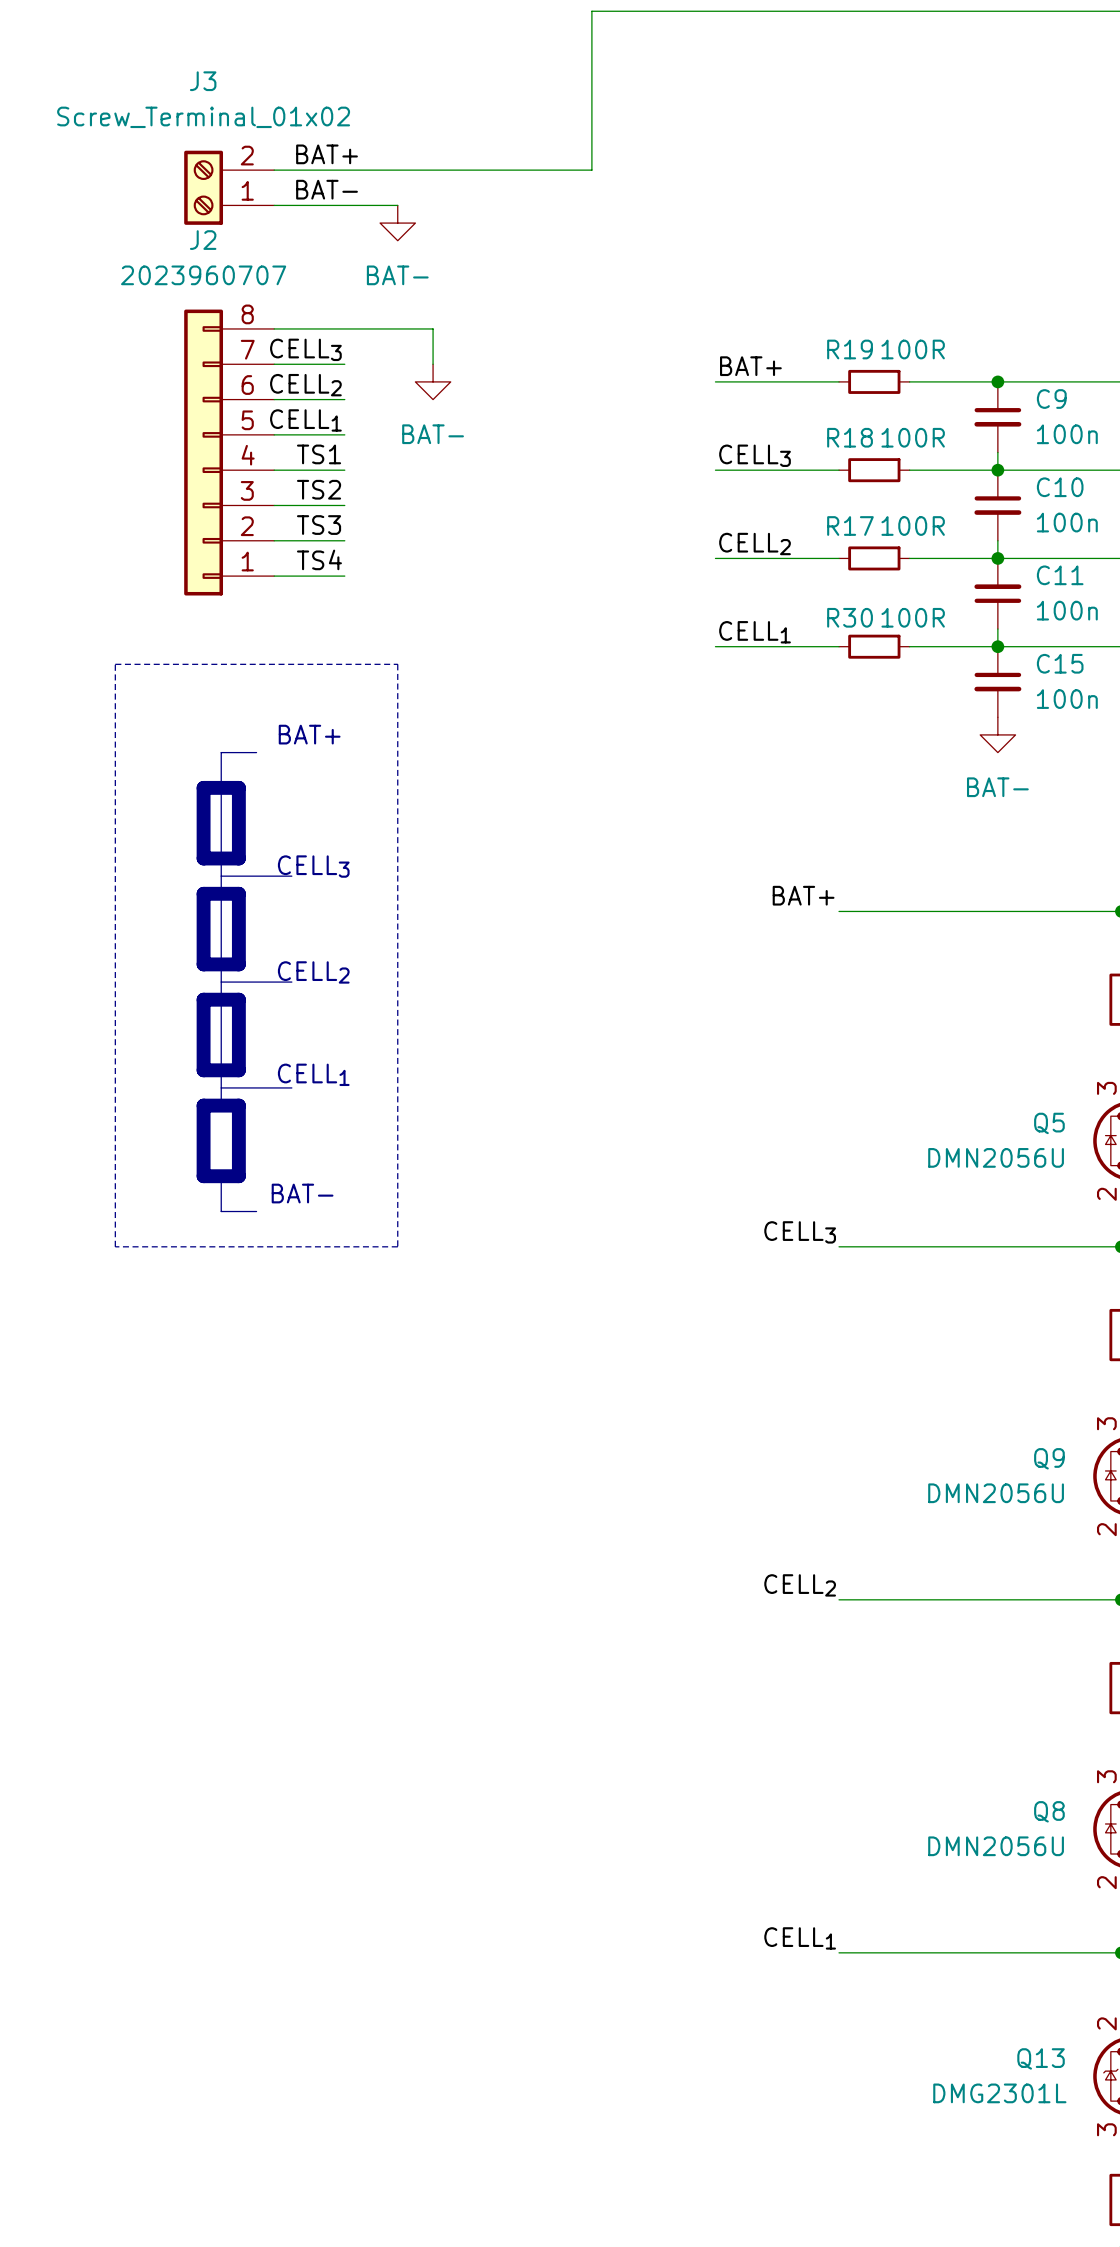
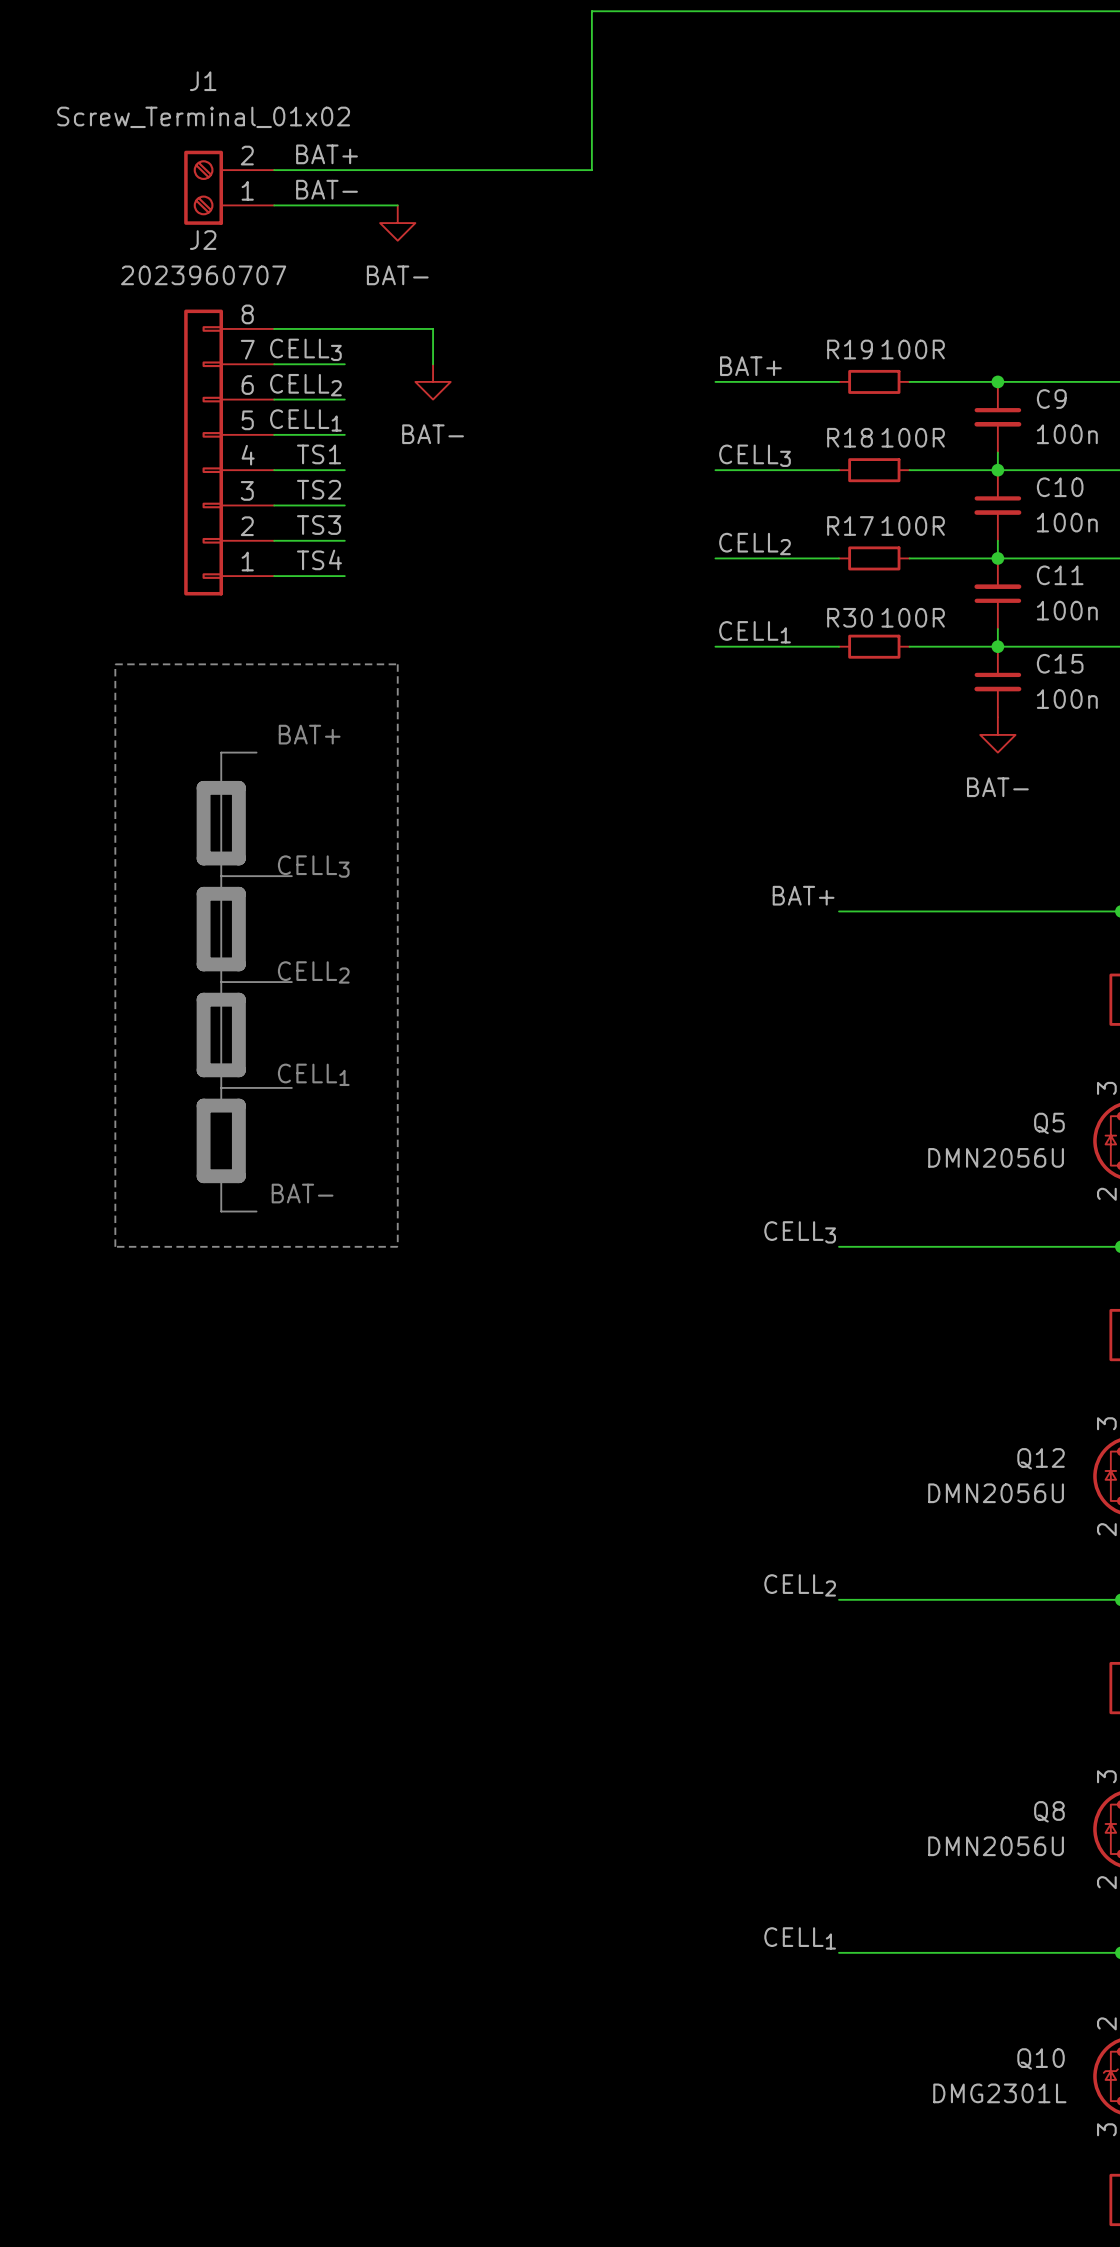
J3 name: J3 (203, 81) -> J1 (203, 81)
Q9 name: Q9 (1049, 1458) -> Q12 (1041, 1458)
Q13 name: Q13 (1041, 2058) -> Q10 (1041, 2058)

